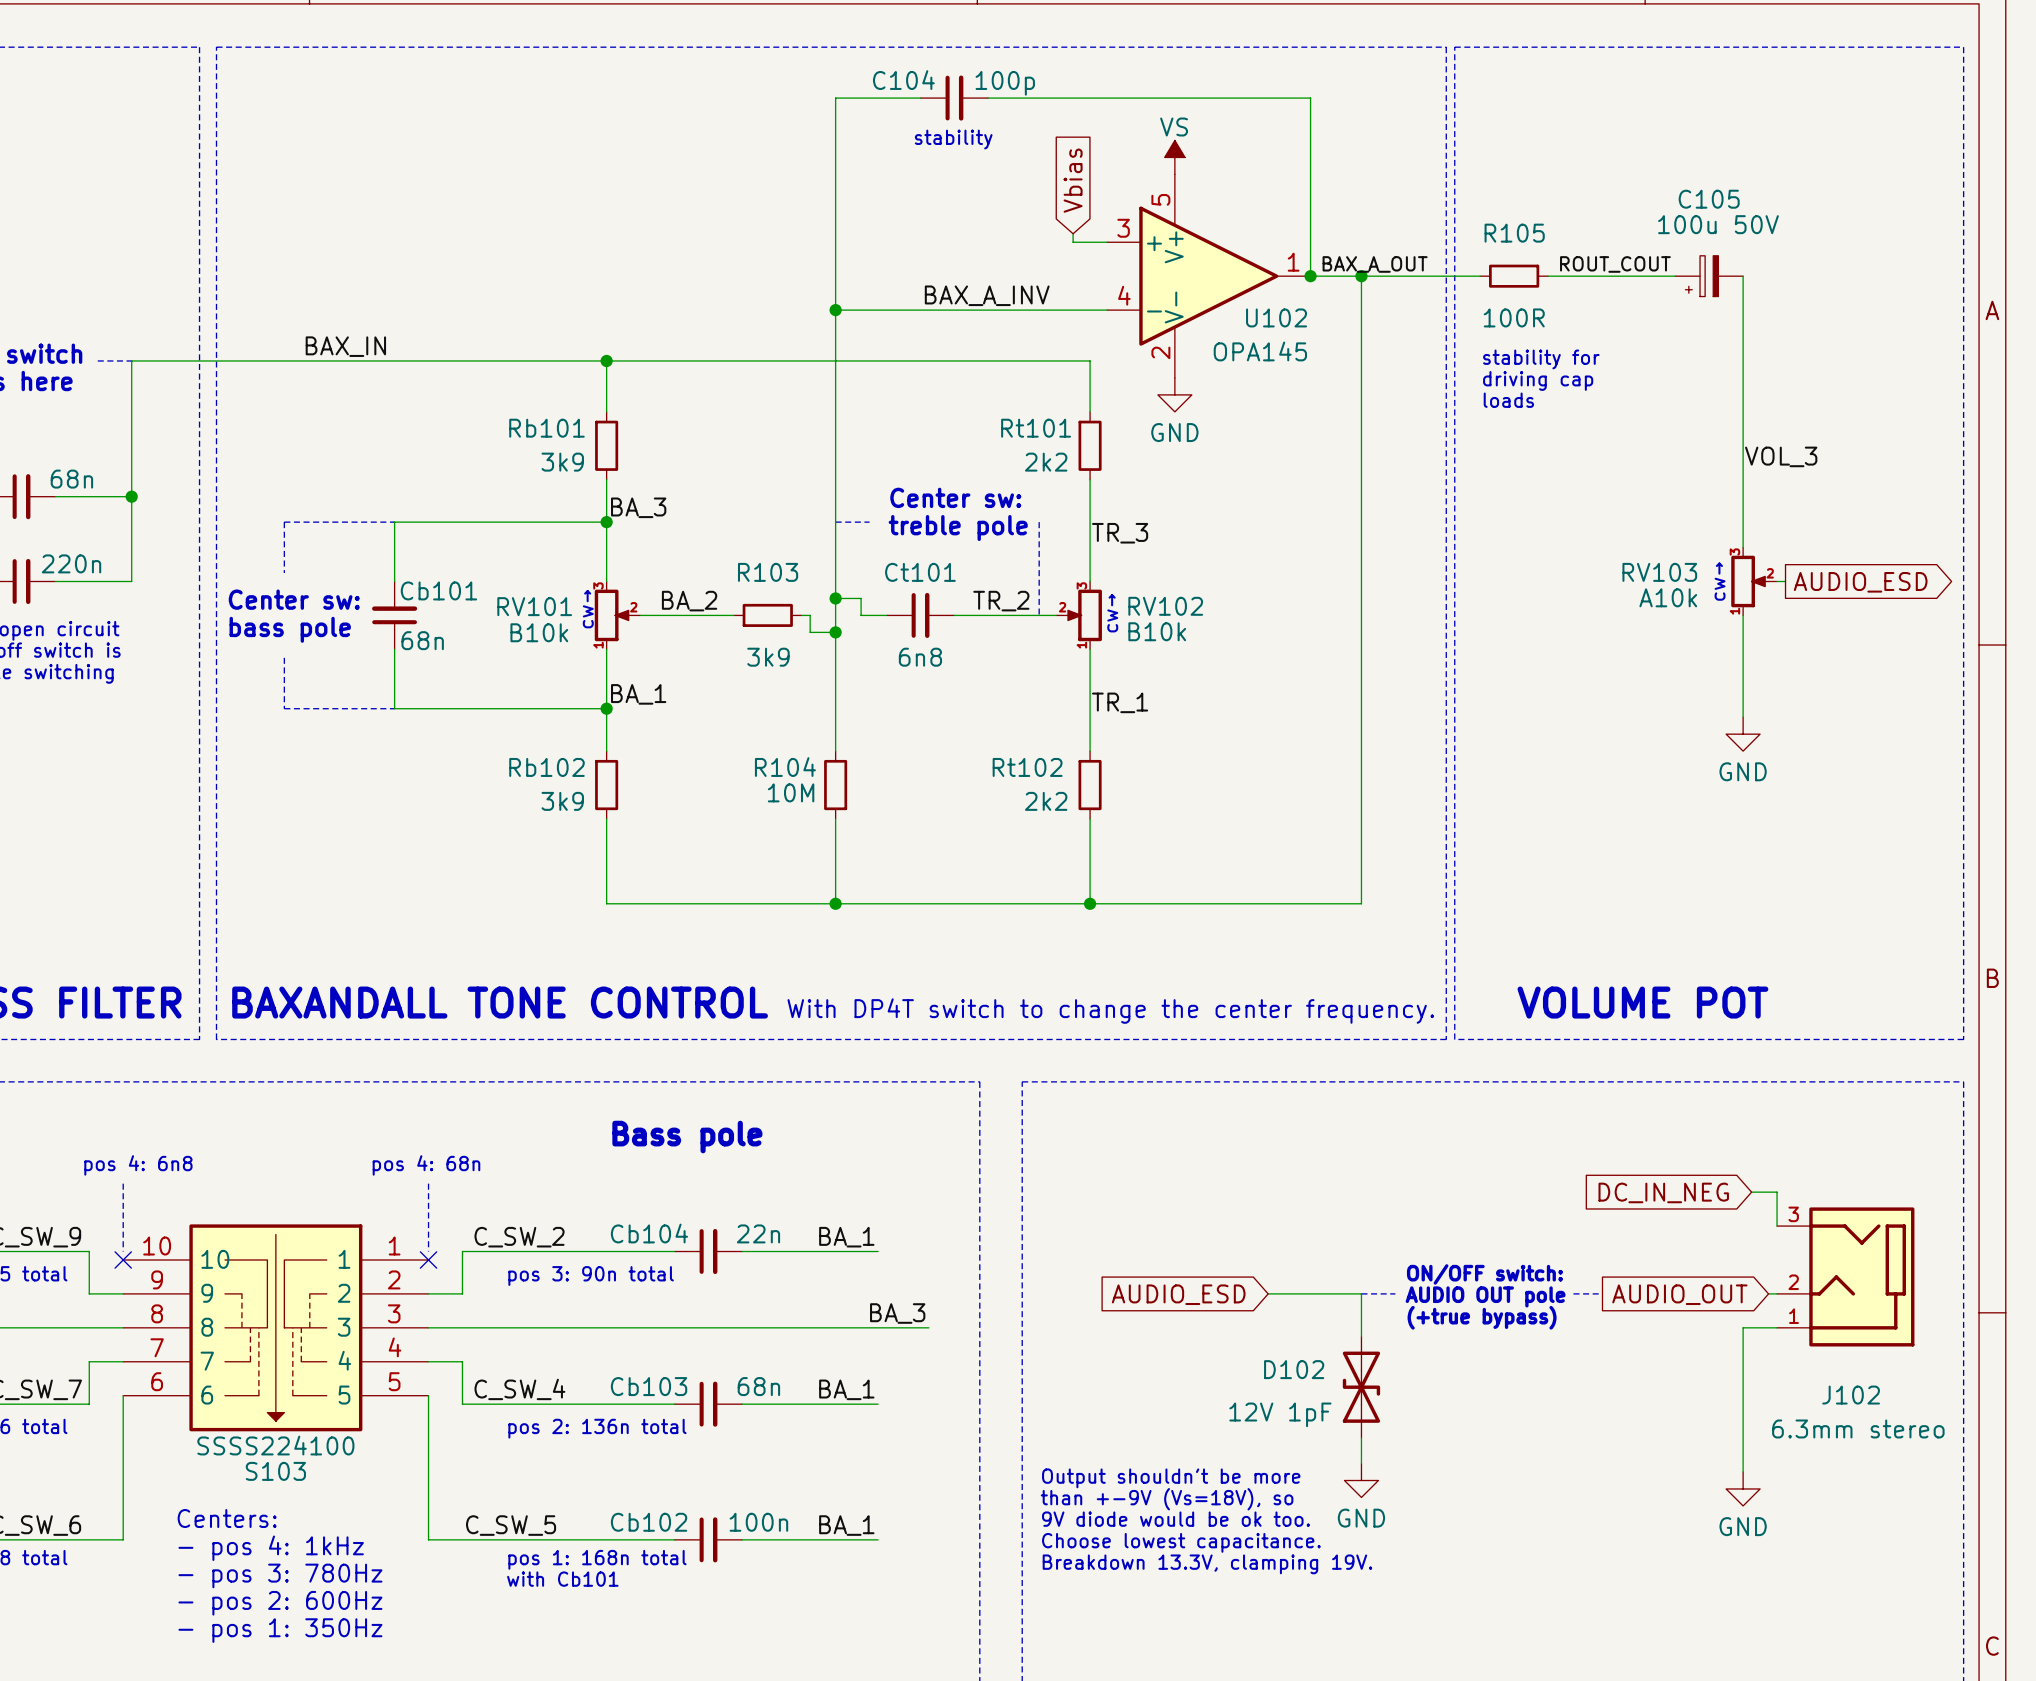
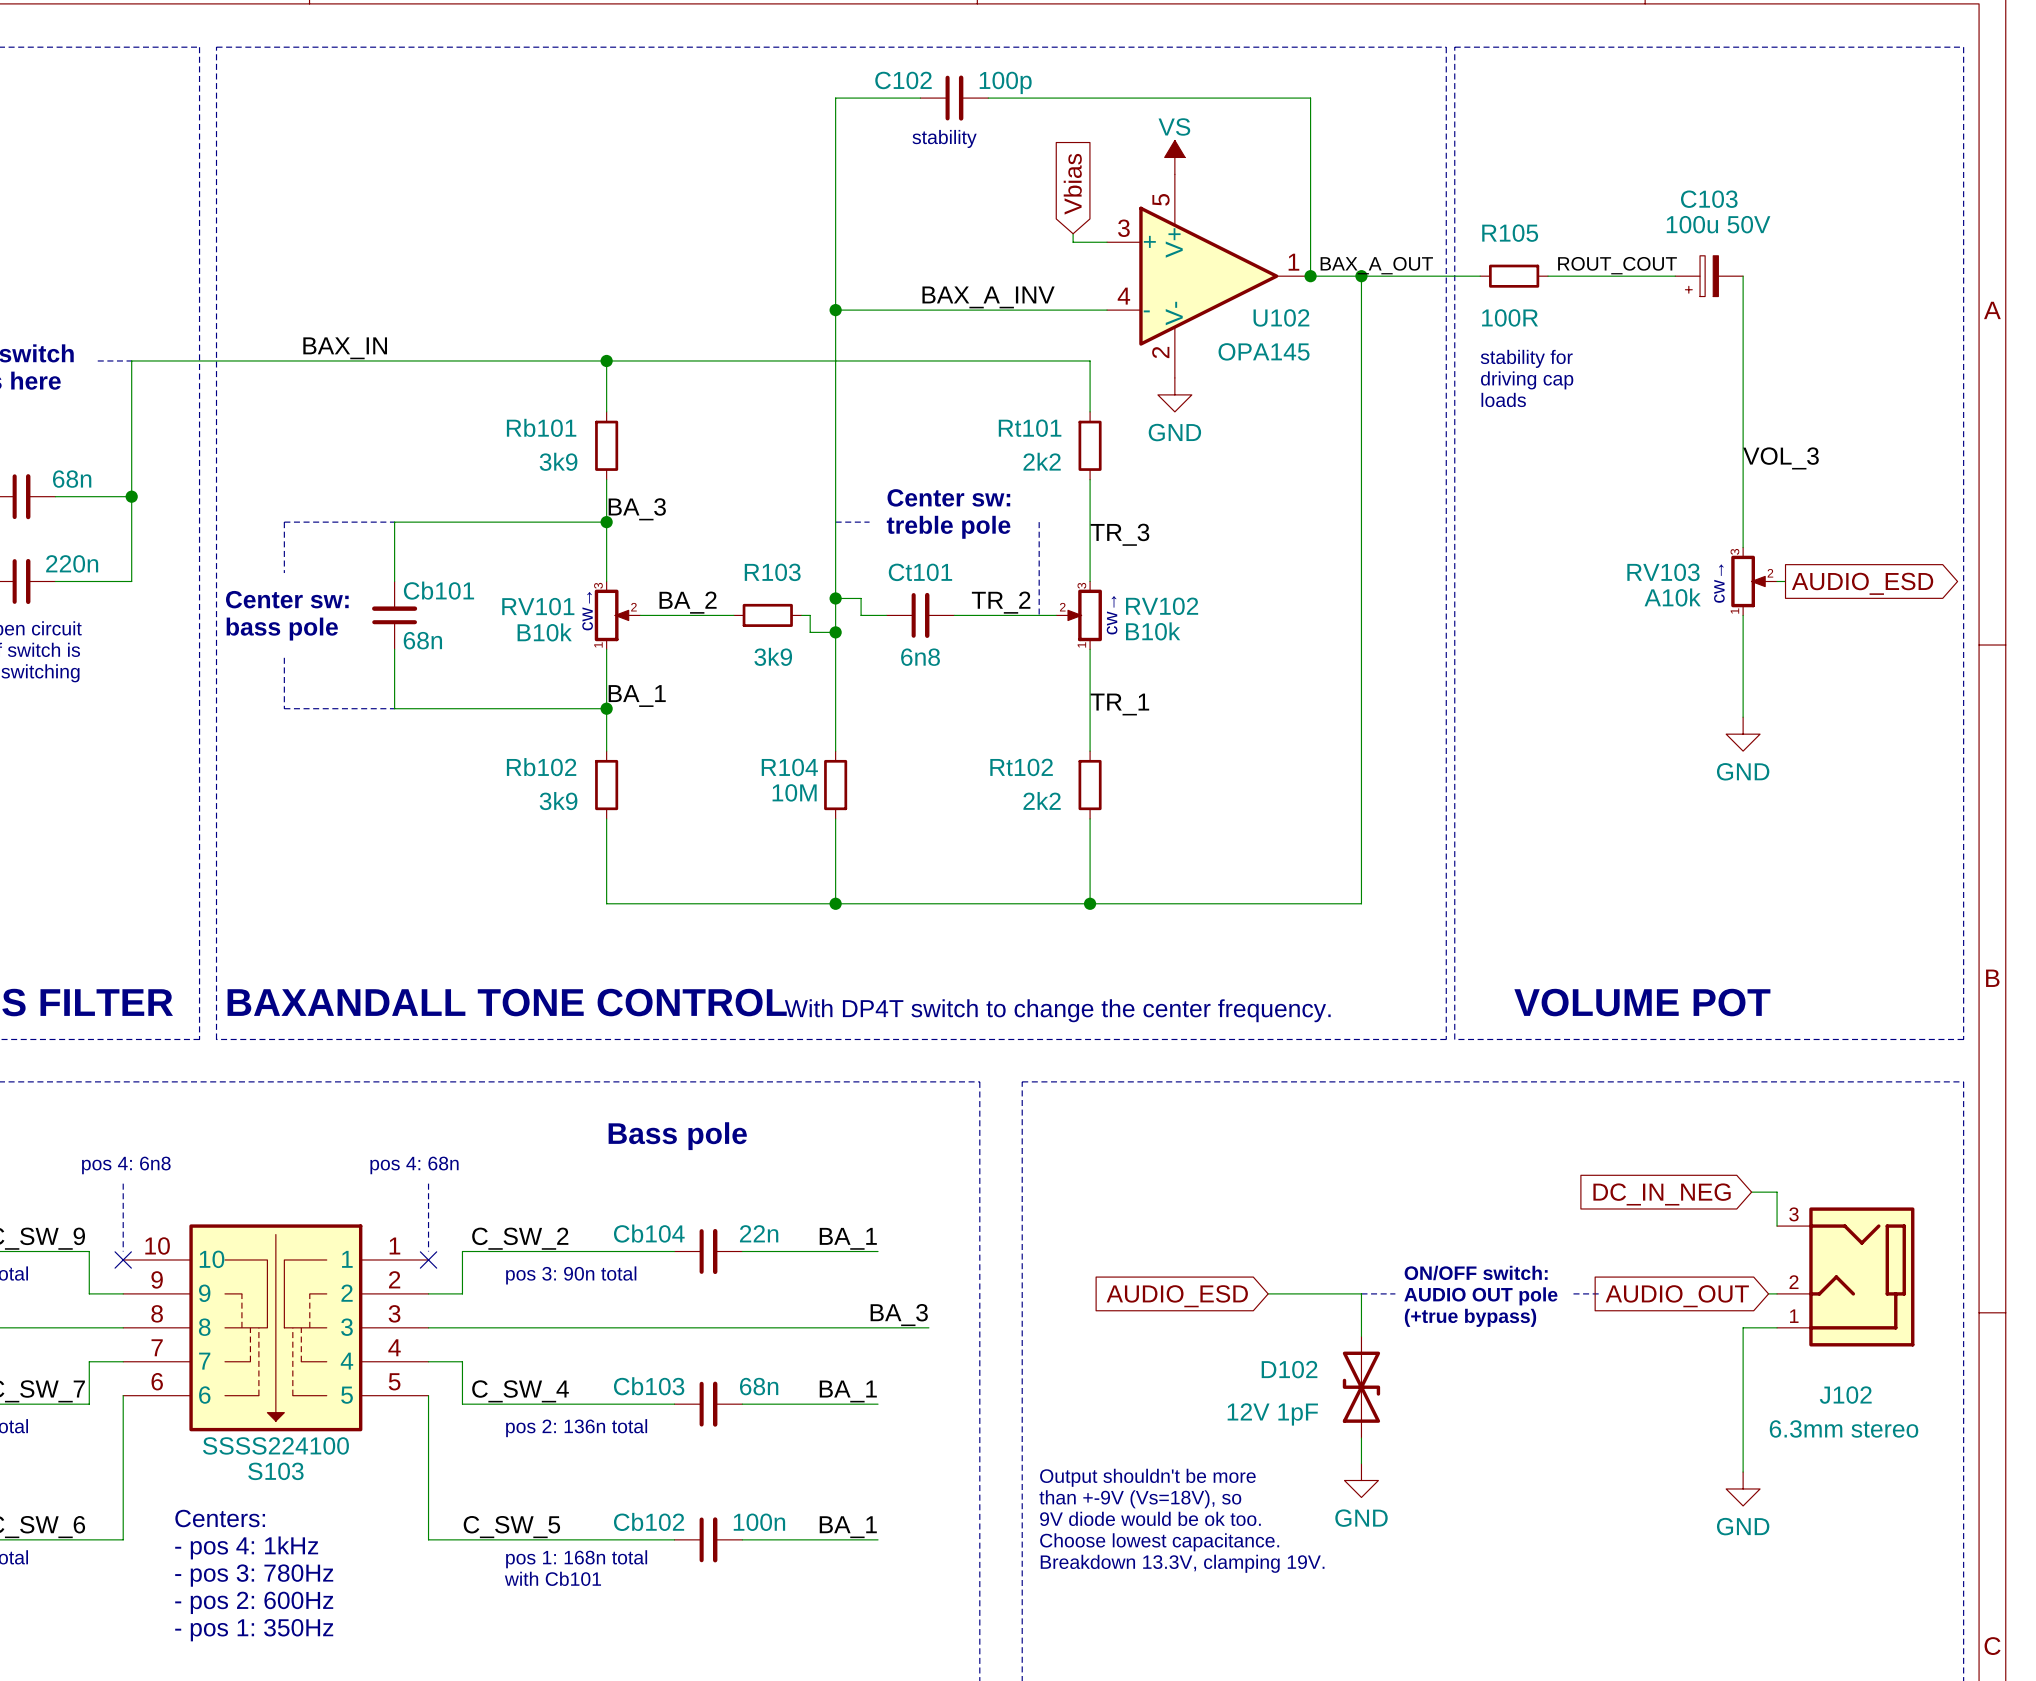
C104 name: C104 (903, 80) -> C102 (903, 80)
C105 name: C105 (1709, 199) -> C103 (1709, 199)

